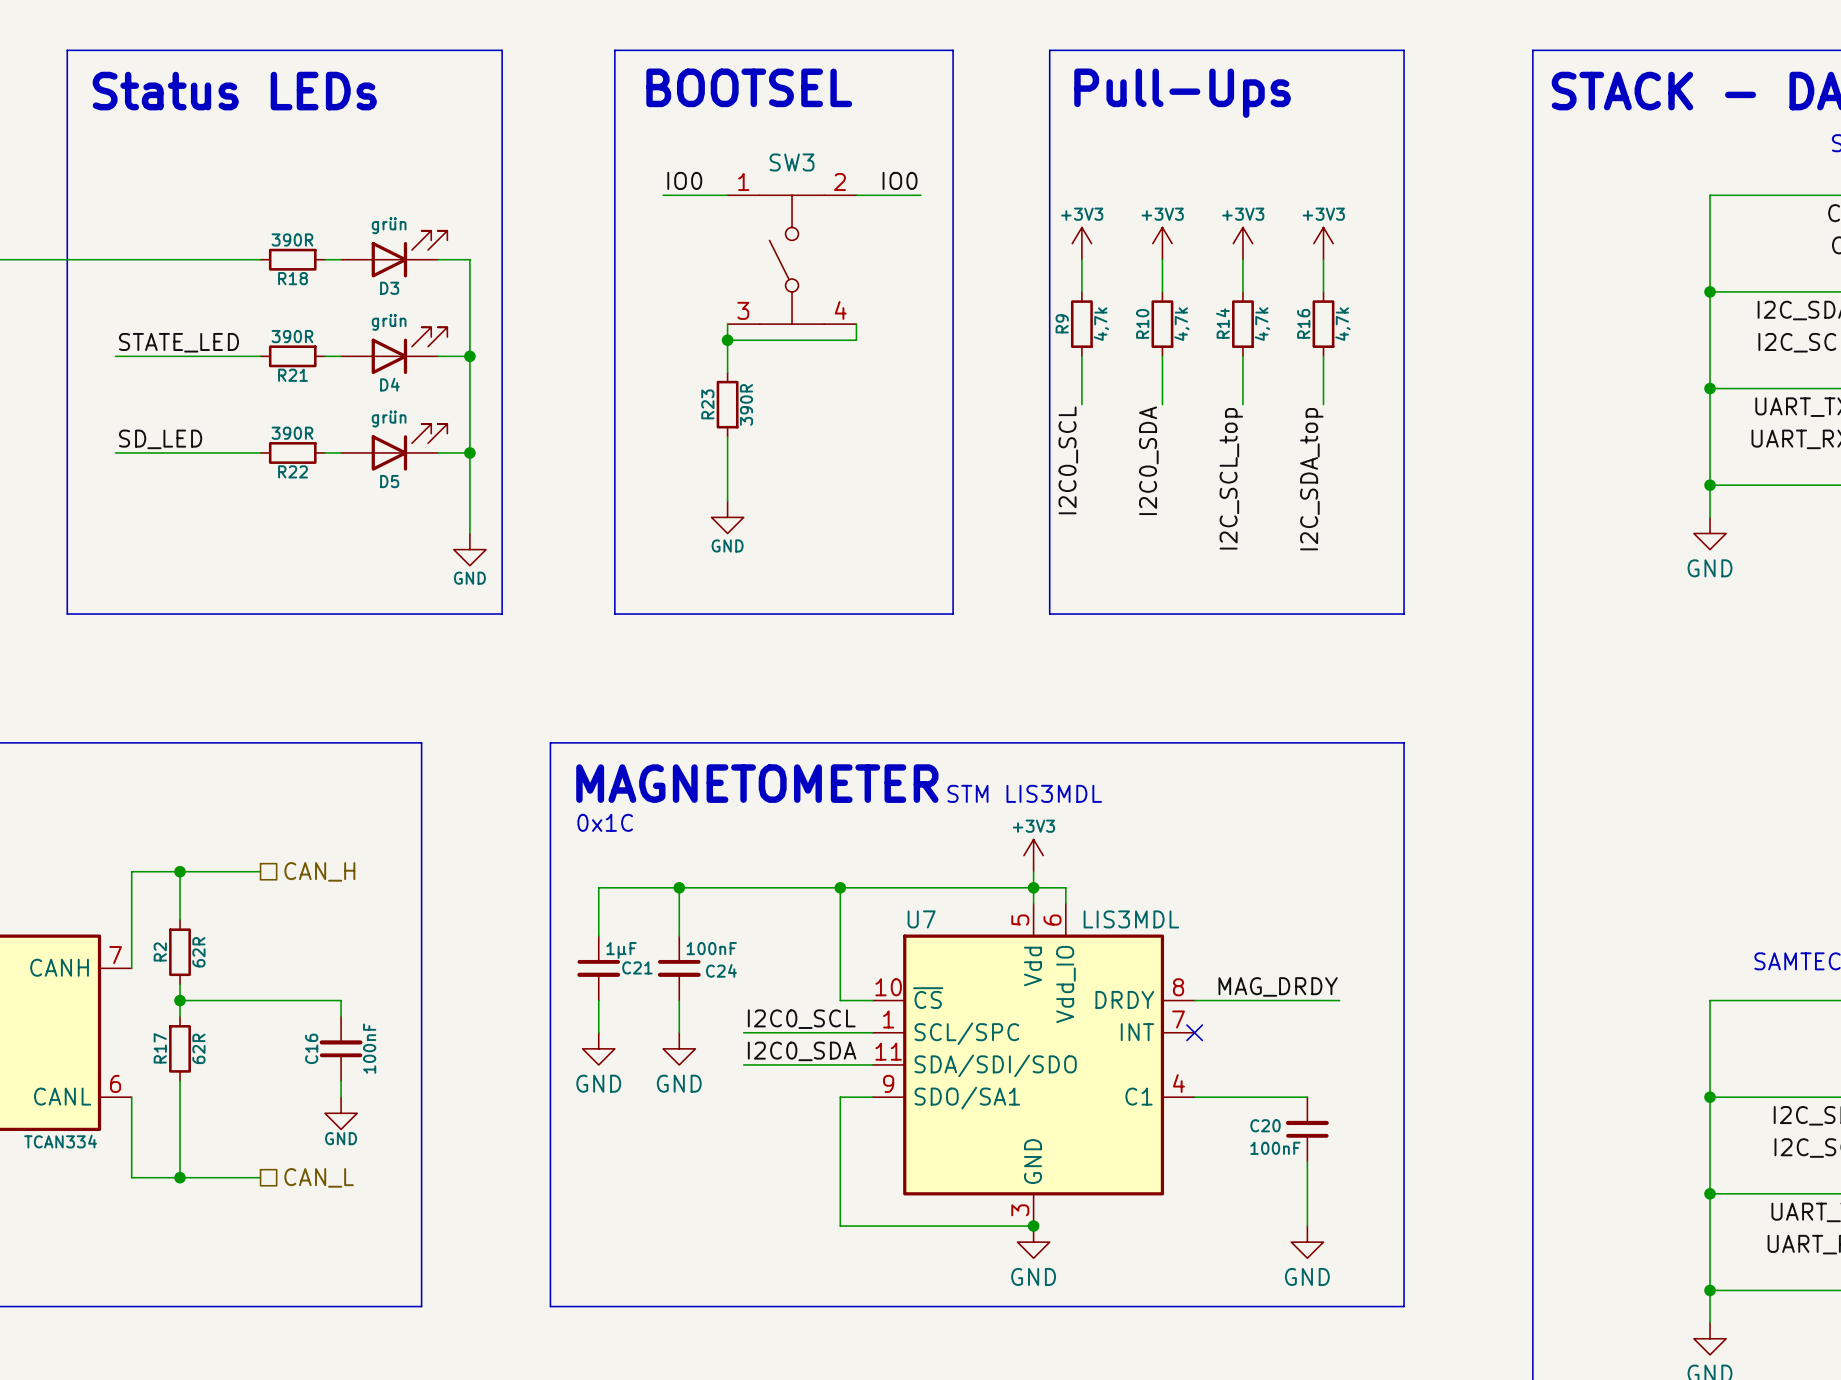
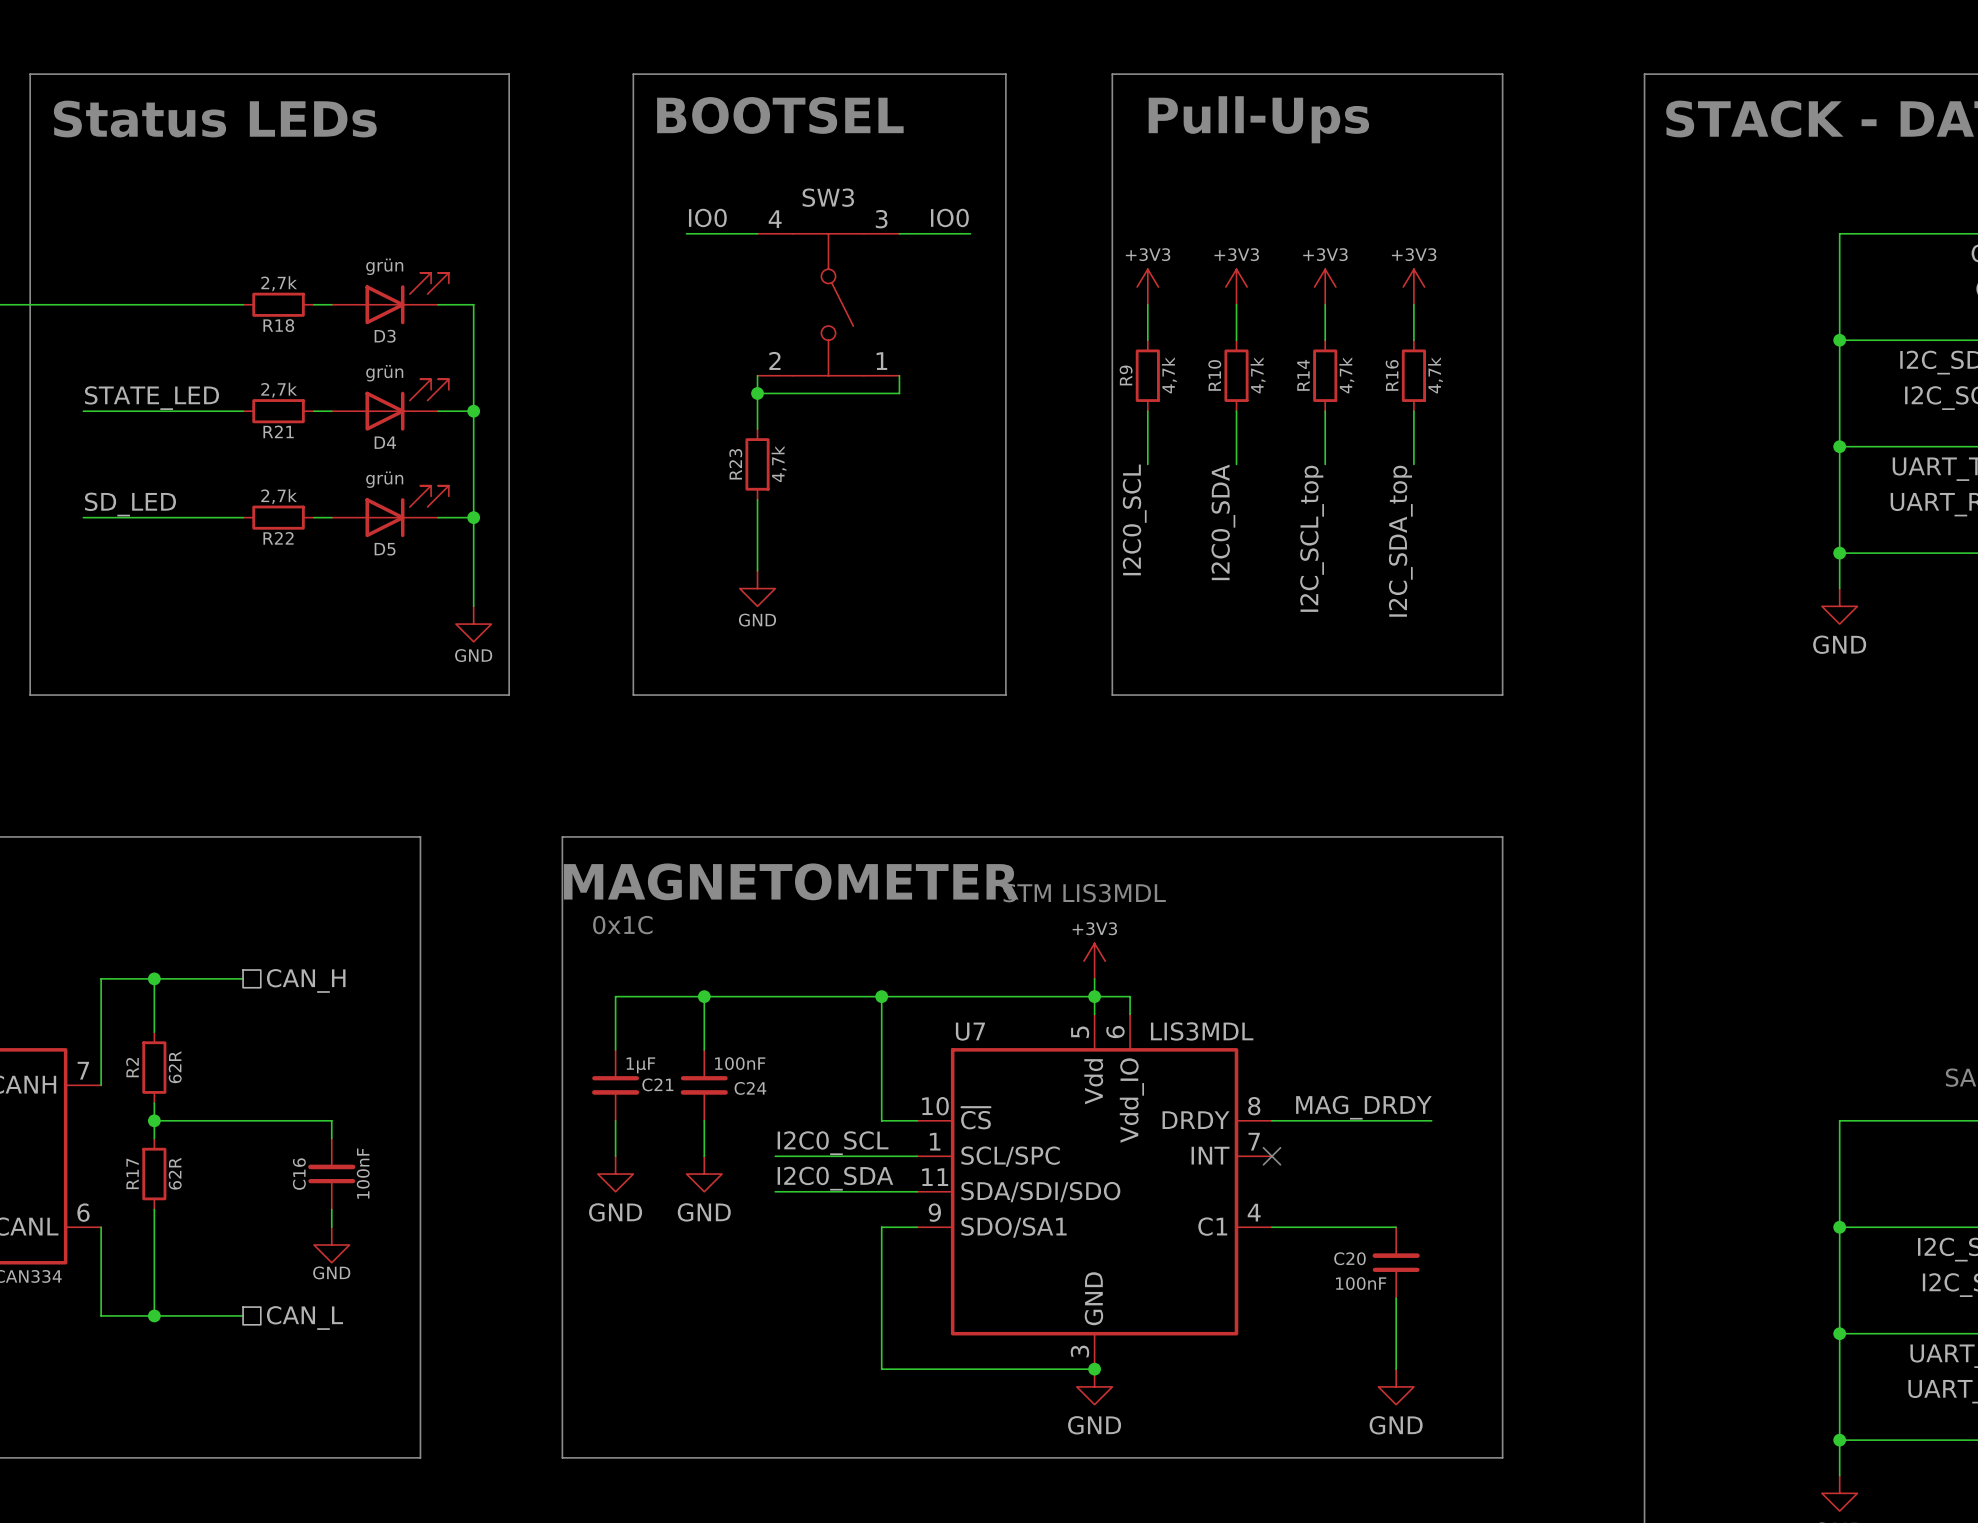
R18 value: 390R (292, 239) -> 2,7k (279, 283)
SW3 rotation: 0° (792, 259) -> 180° (828, 304)
R21 value: 390R (292, 336) -> 2,7k (279, 390)
R23 value: 390R (746, 404) -> 4,7k (779, 464)
R22 value: 390R (292, 433) -> 2,7k (279, 496)

